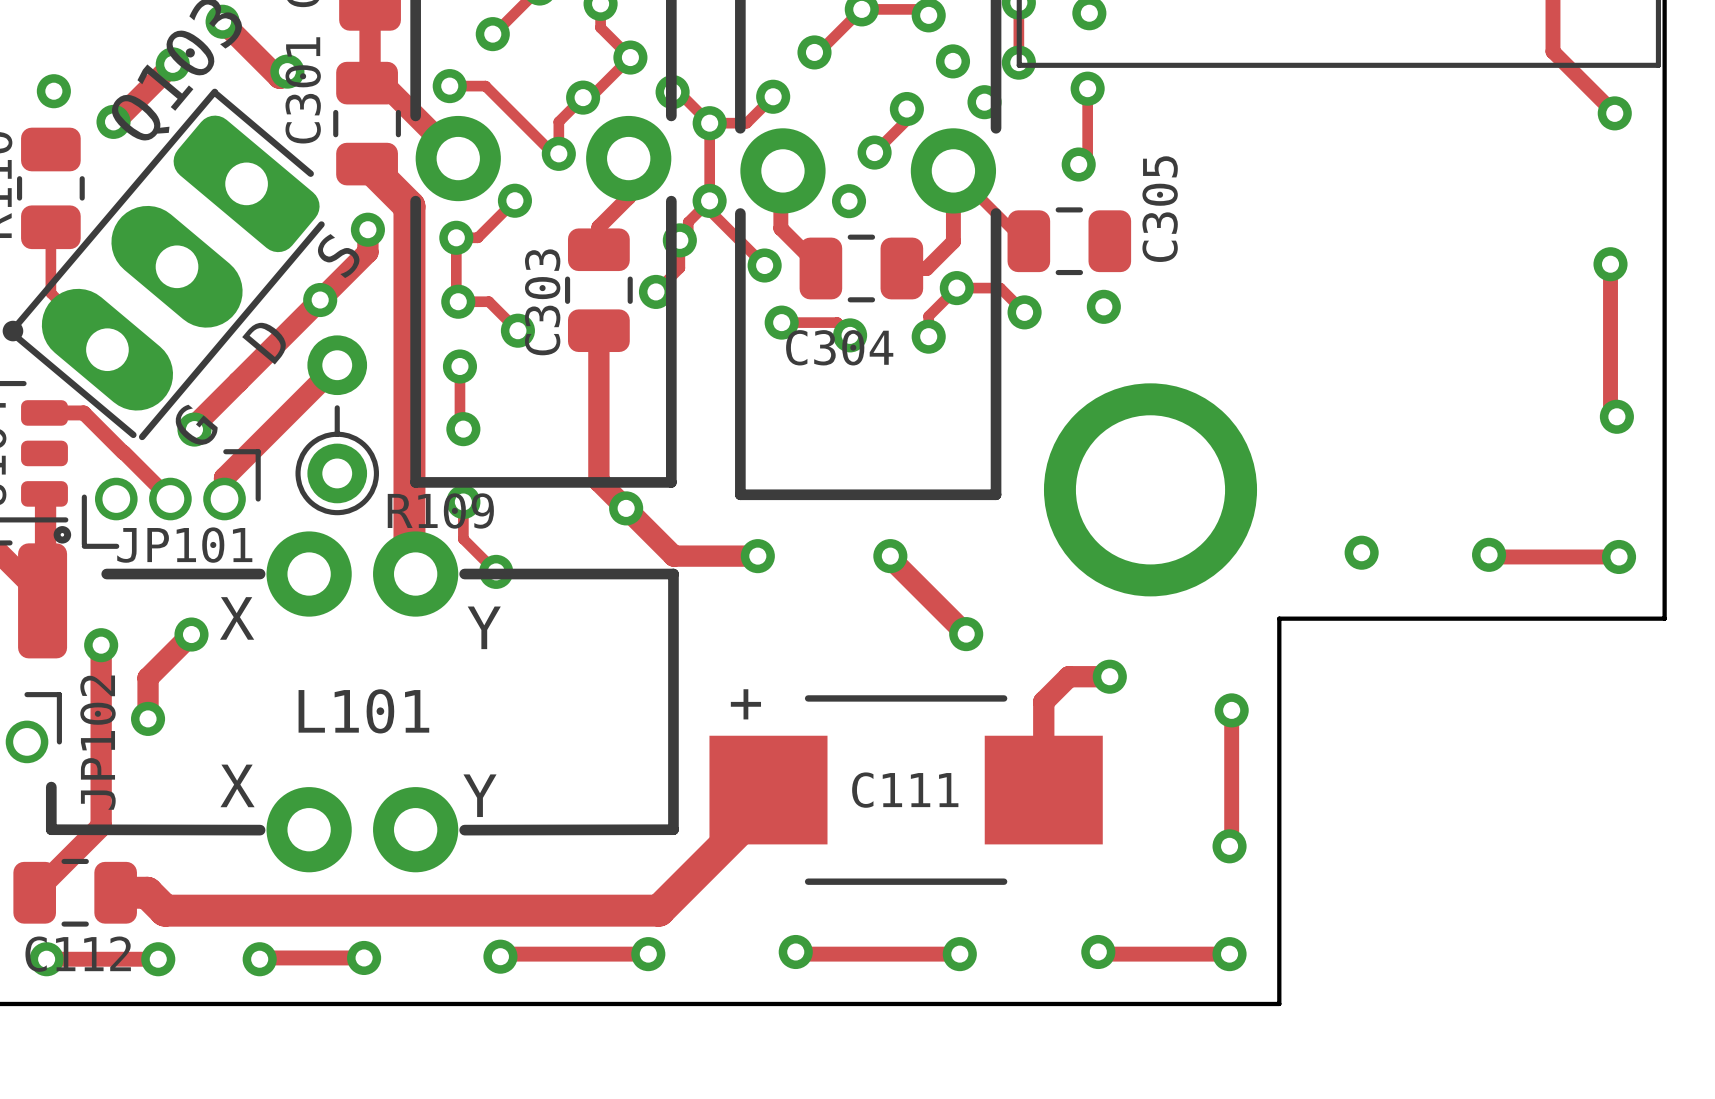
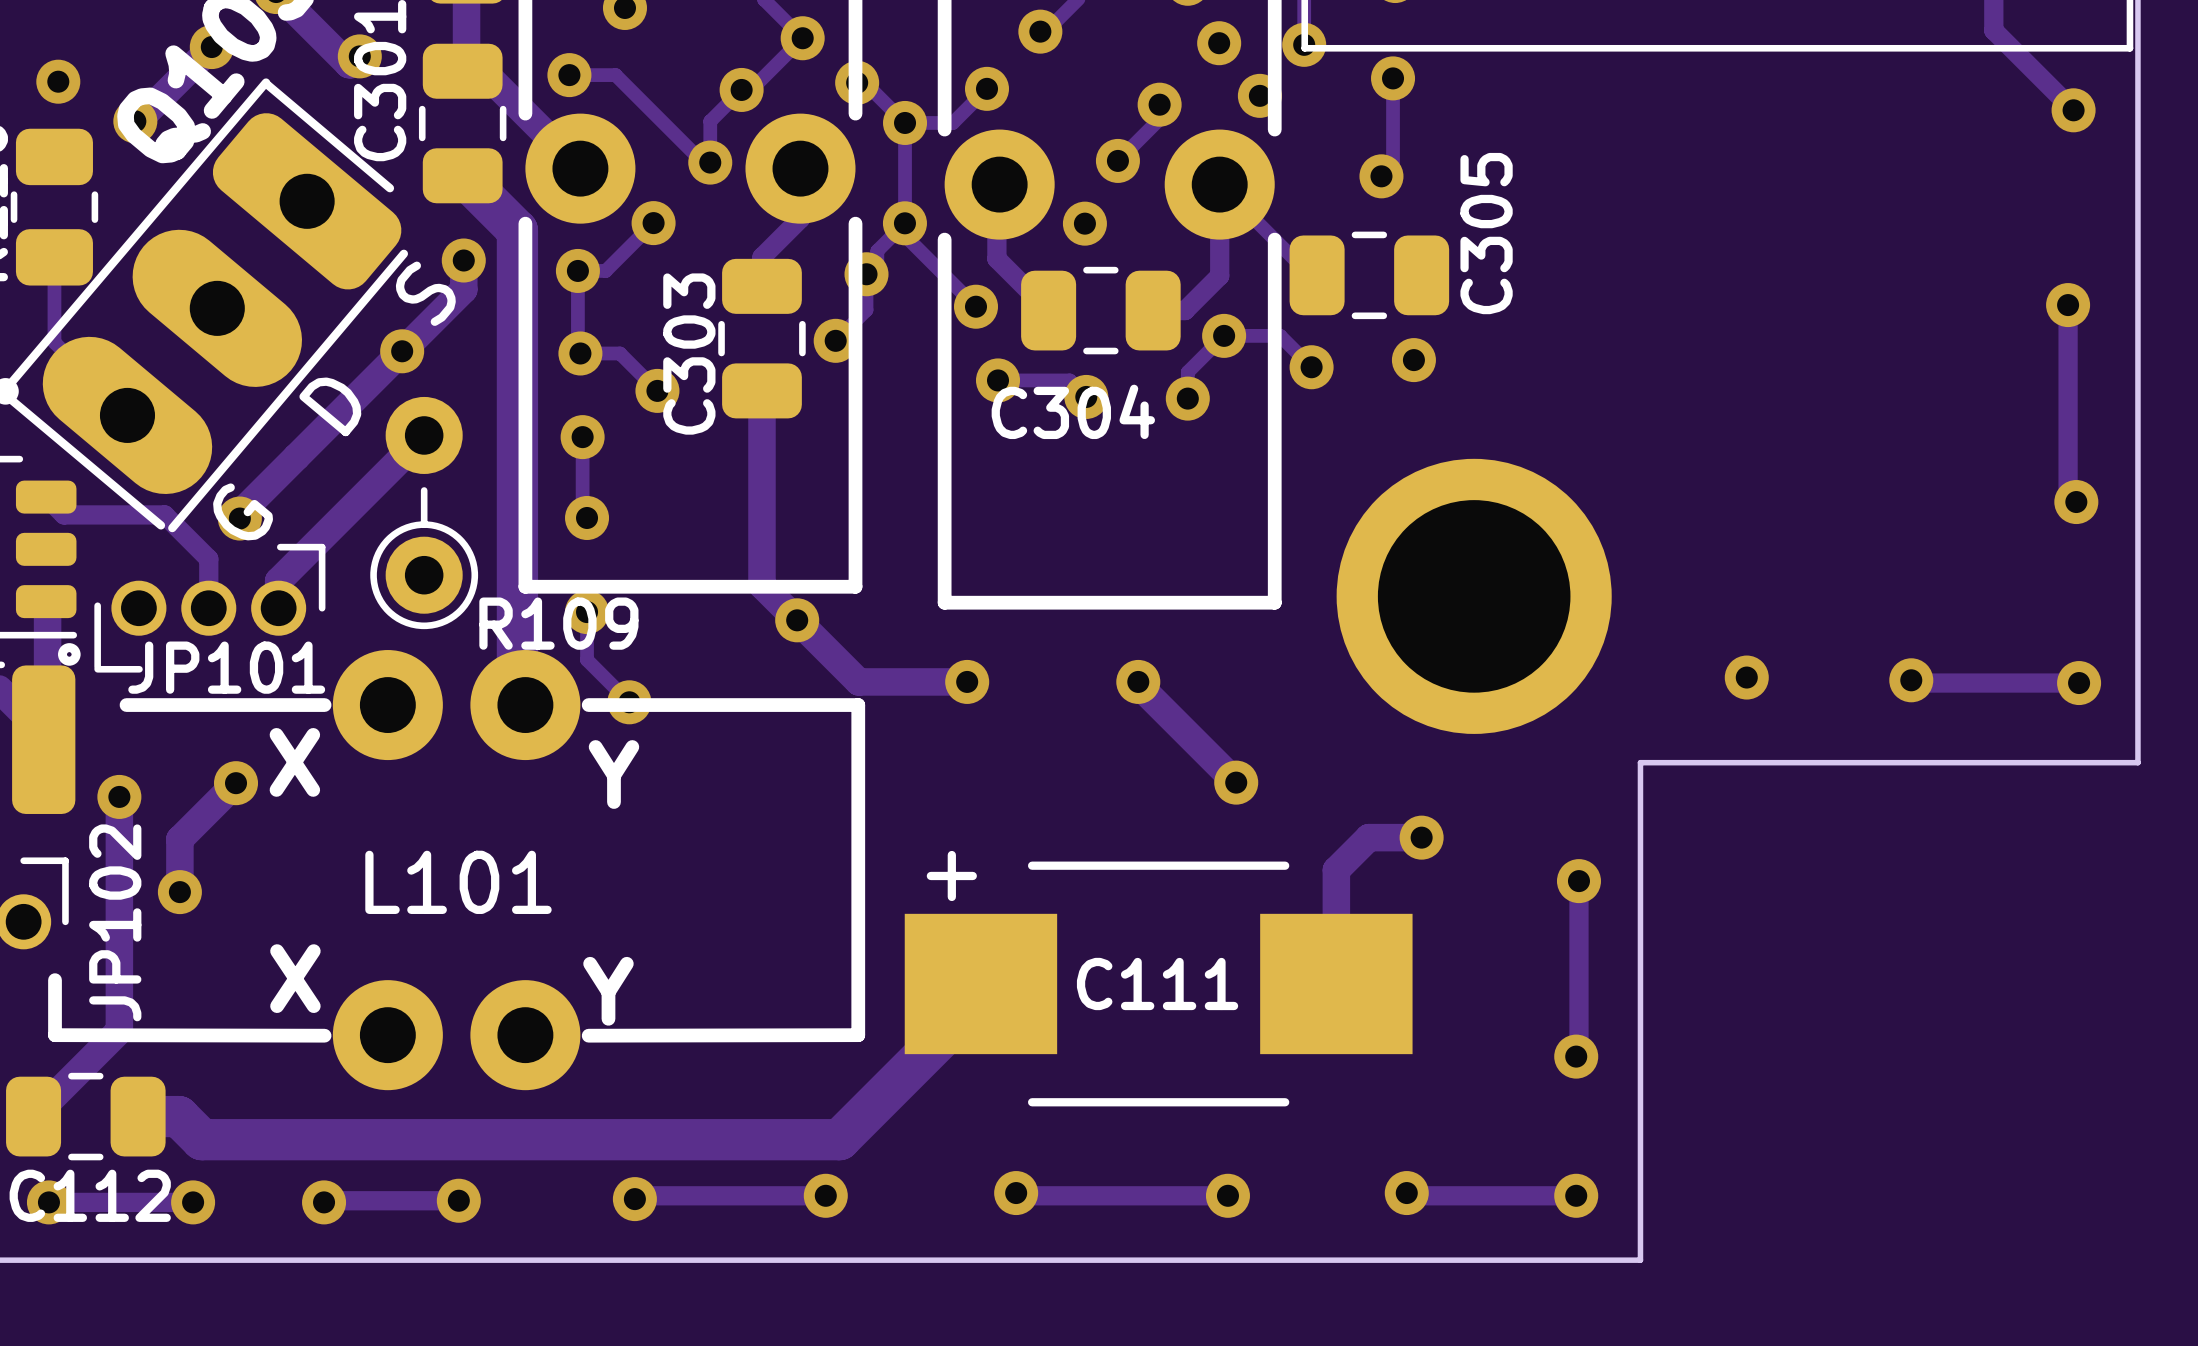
track: (44, 412) (83, 412) (123, 452) -> (46, 497) (64, 514) (164, 514) (208, 558) (208, 592)
track: (123, 452) (170, 499) -> none

